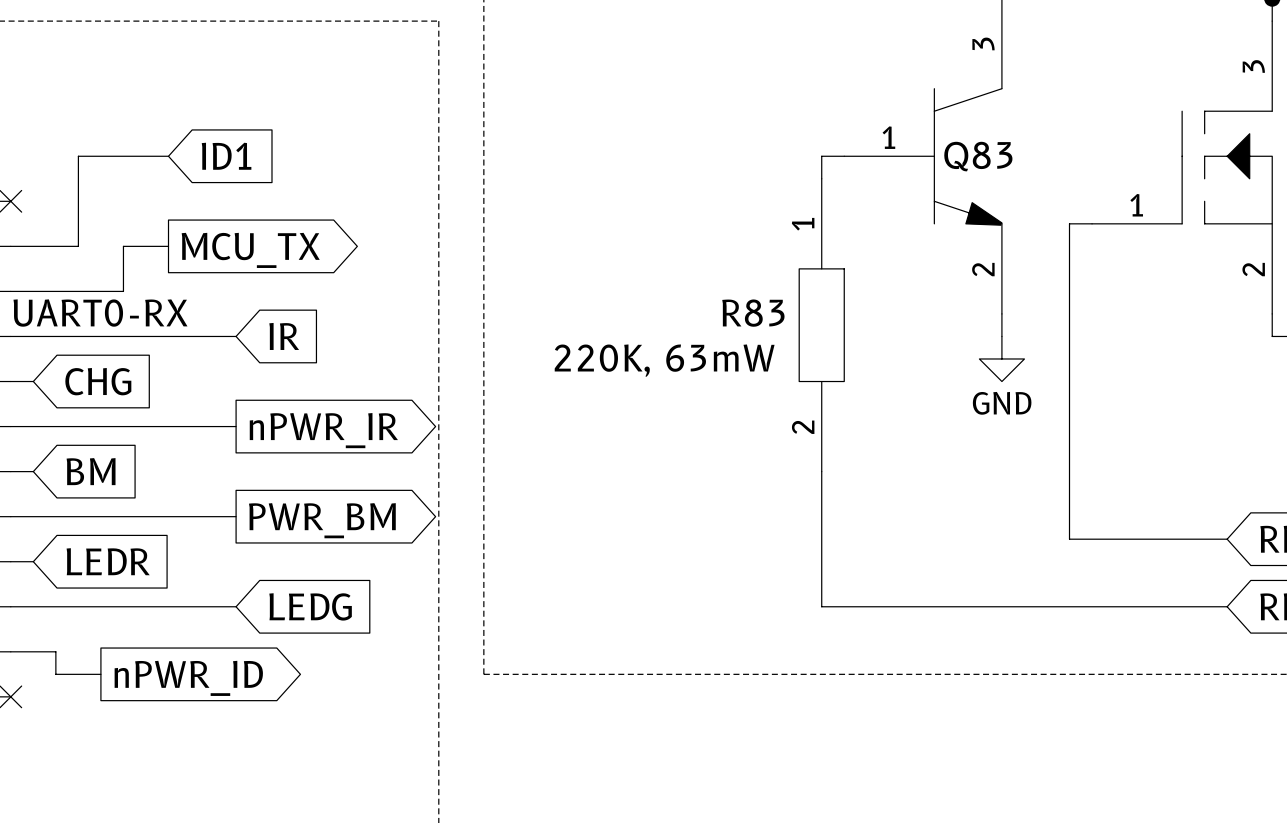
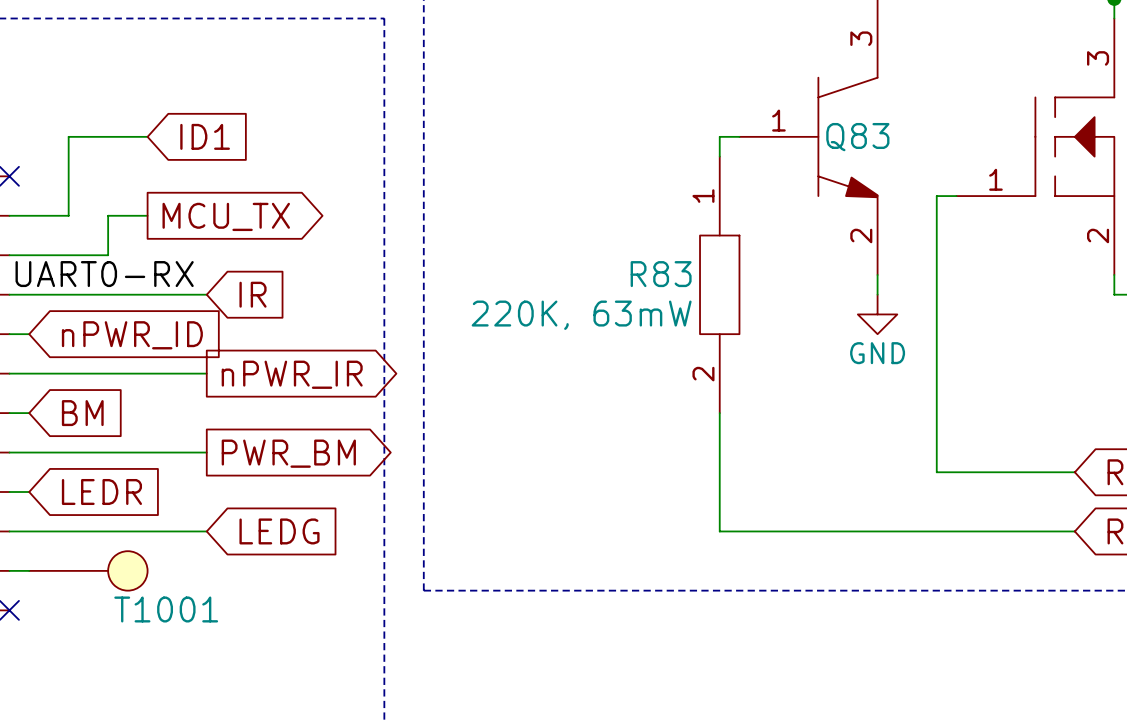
global label: CHG (98, 381) -> nPWR_ID (132, 335)
wire: (33, 651) (55, 651) (55, 674) (100, 674) -> none
T1001: none -> (88, 570)
global label: nPWR_ID (188, 678) -> none

